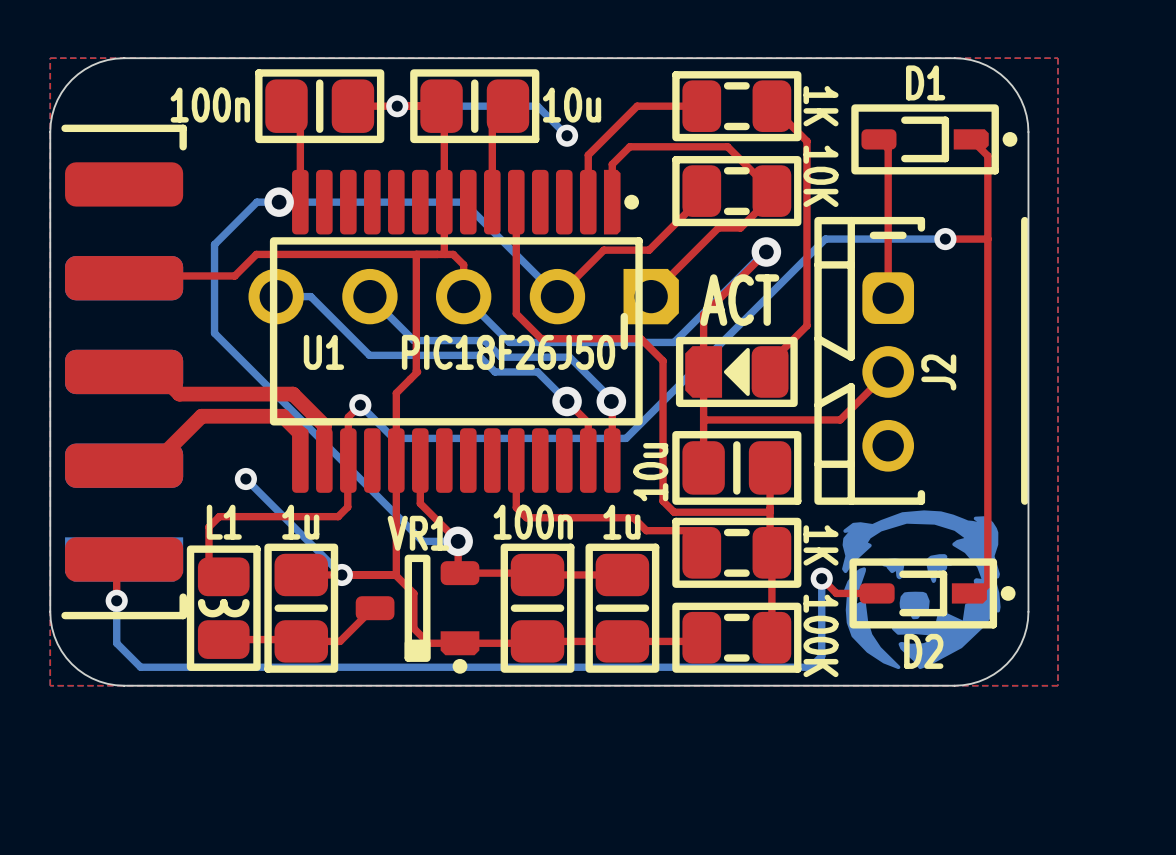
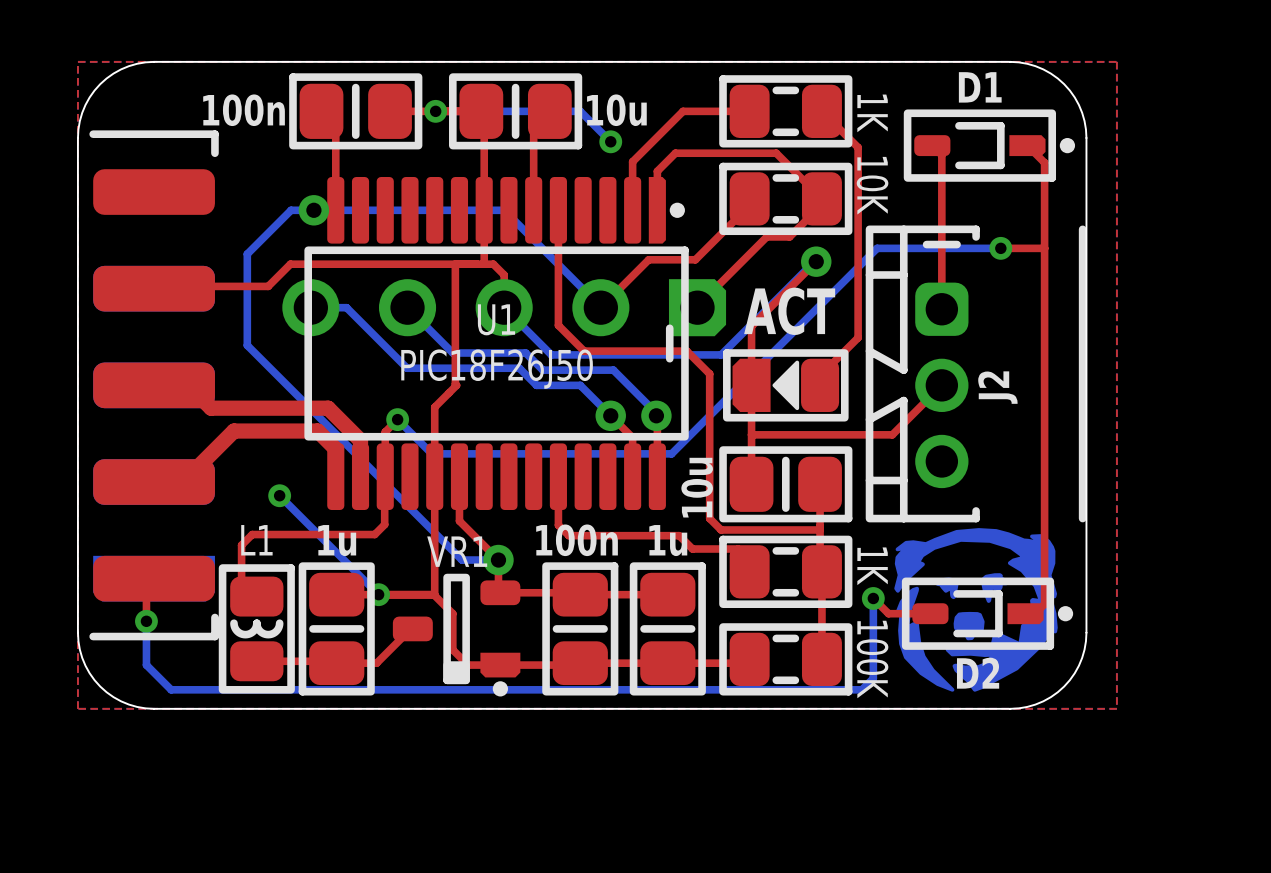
U1 name position: U1 (323, 352) -> U1 (496, 319)
U1 value position: PIC18F26J50 (508, 352) -> PIC18F26J50 (497, 369)

